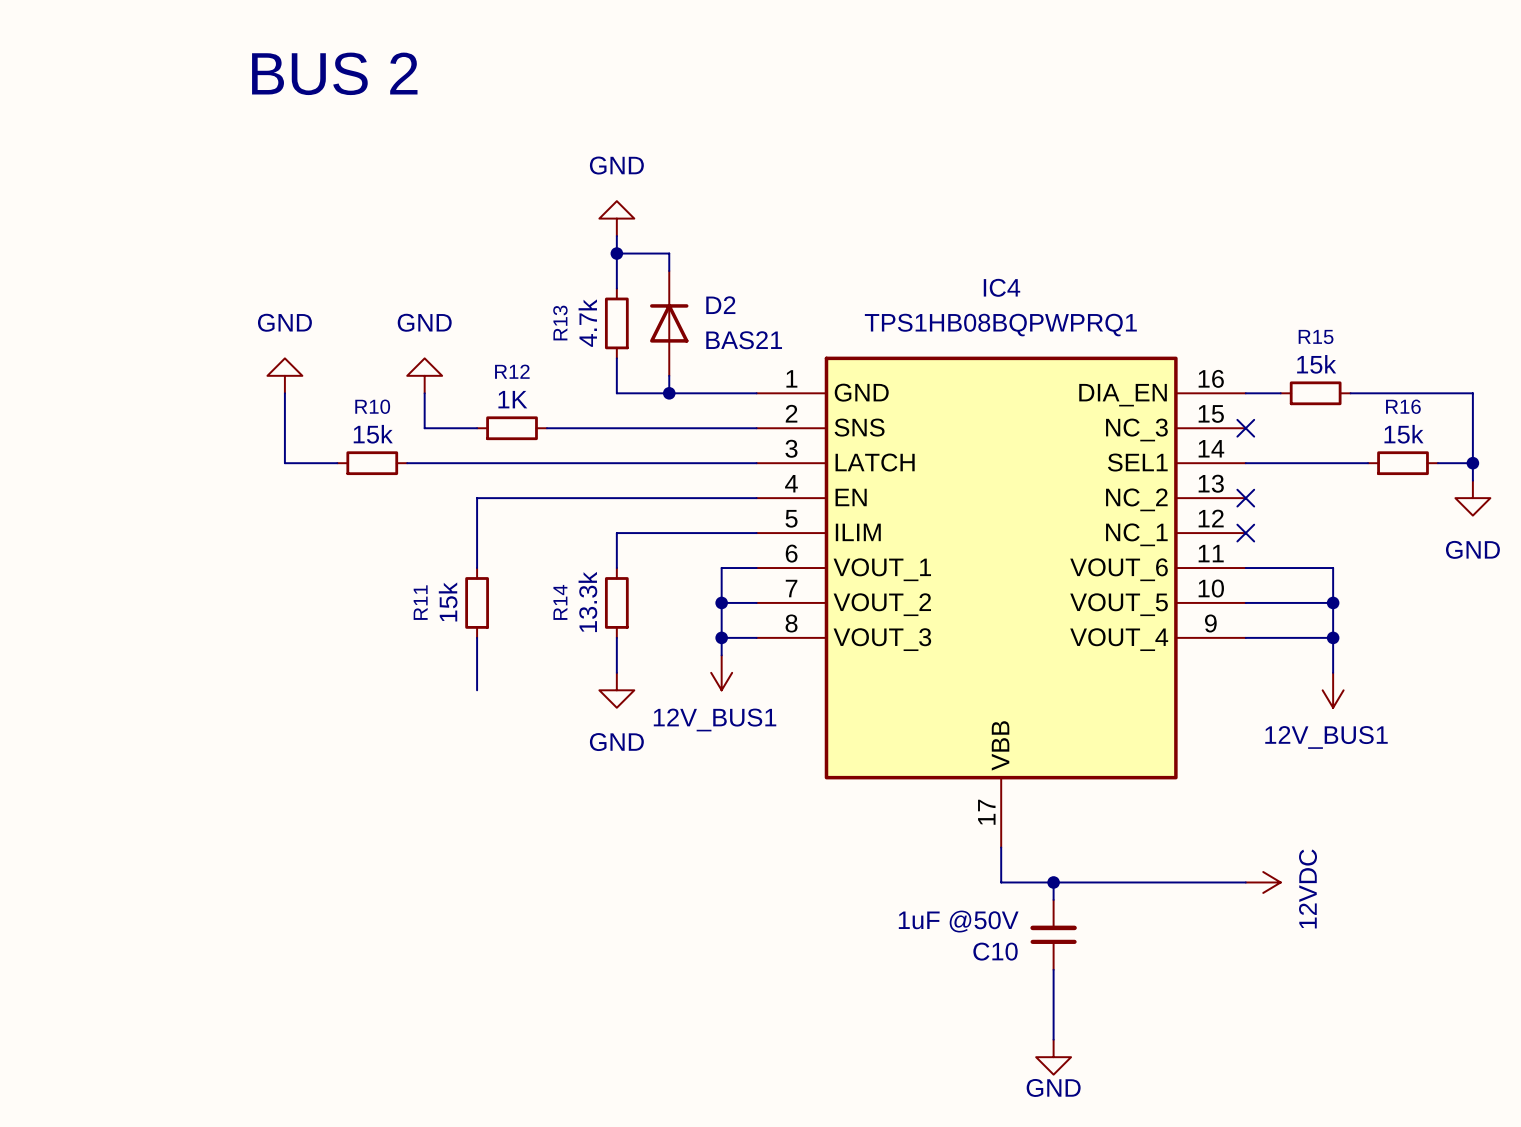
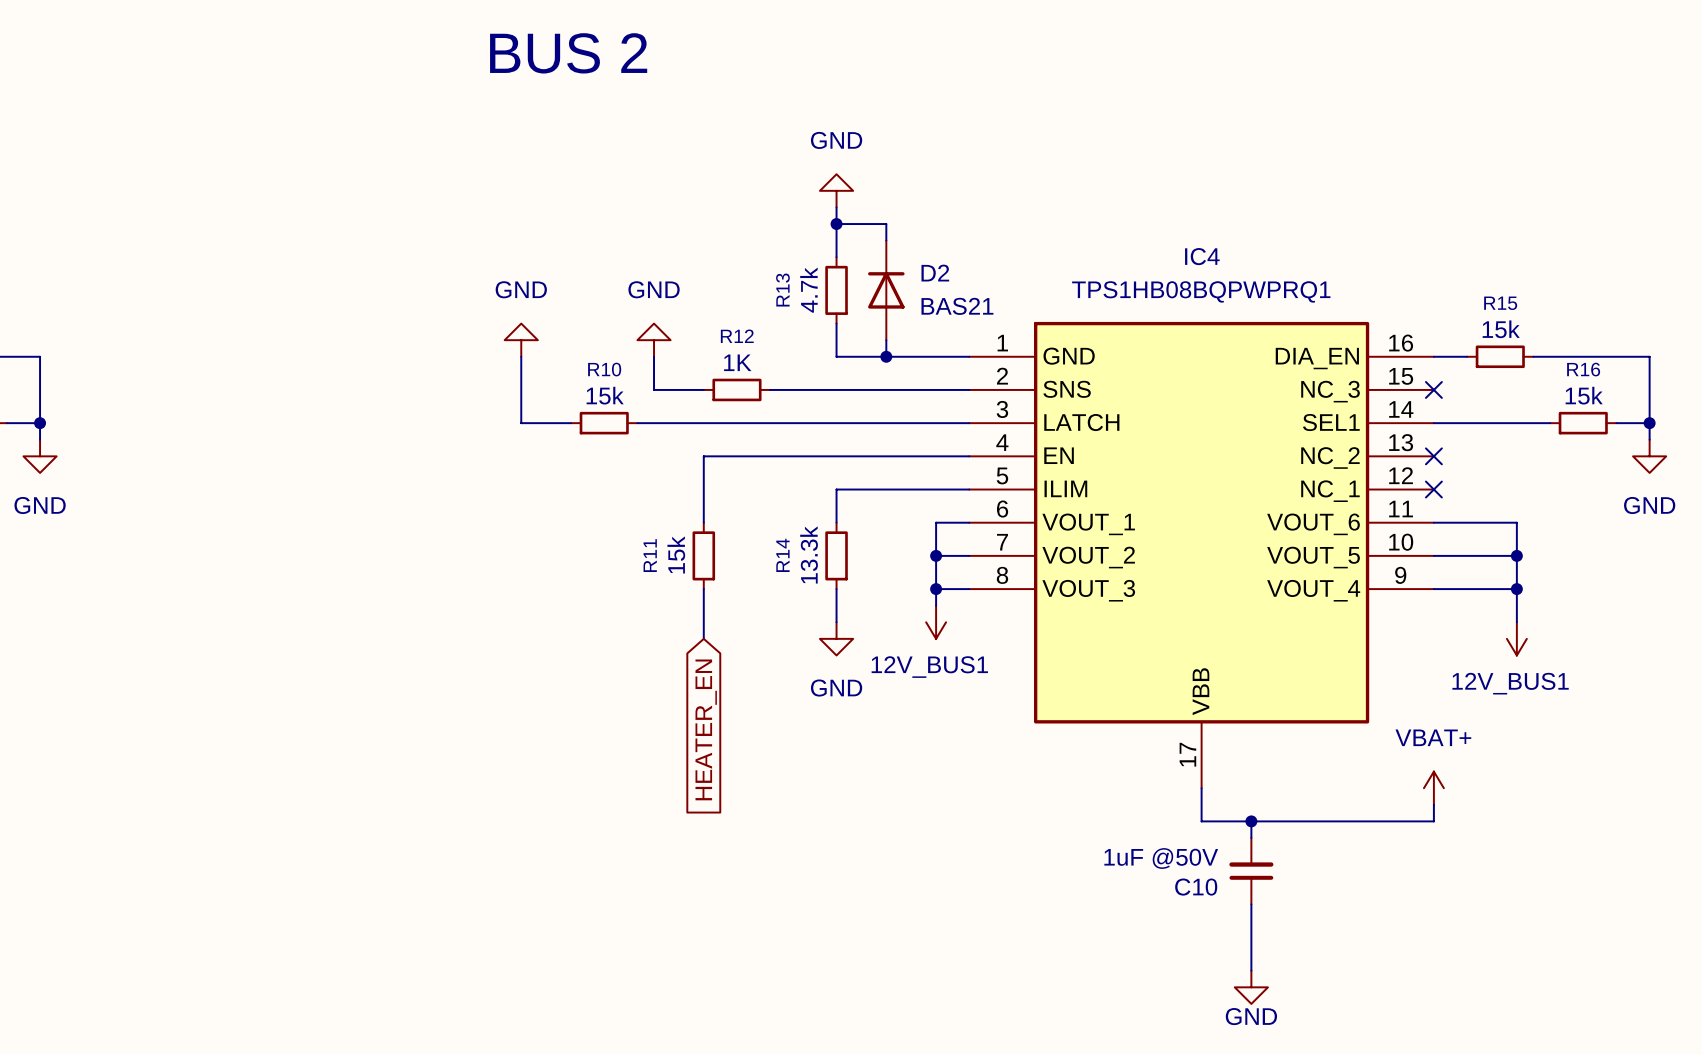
global label: none -> HEATER_EN (706, 729)
power symbol: none -> VBAT+ (1433, 788)
wire: none -> (1433, 804) (1433, 821)
power symbol: 12VDC (1263, 882) -> none

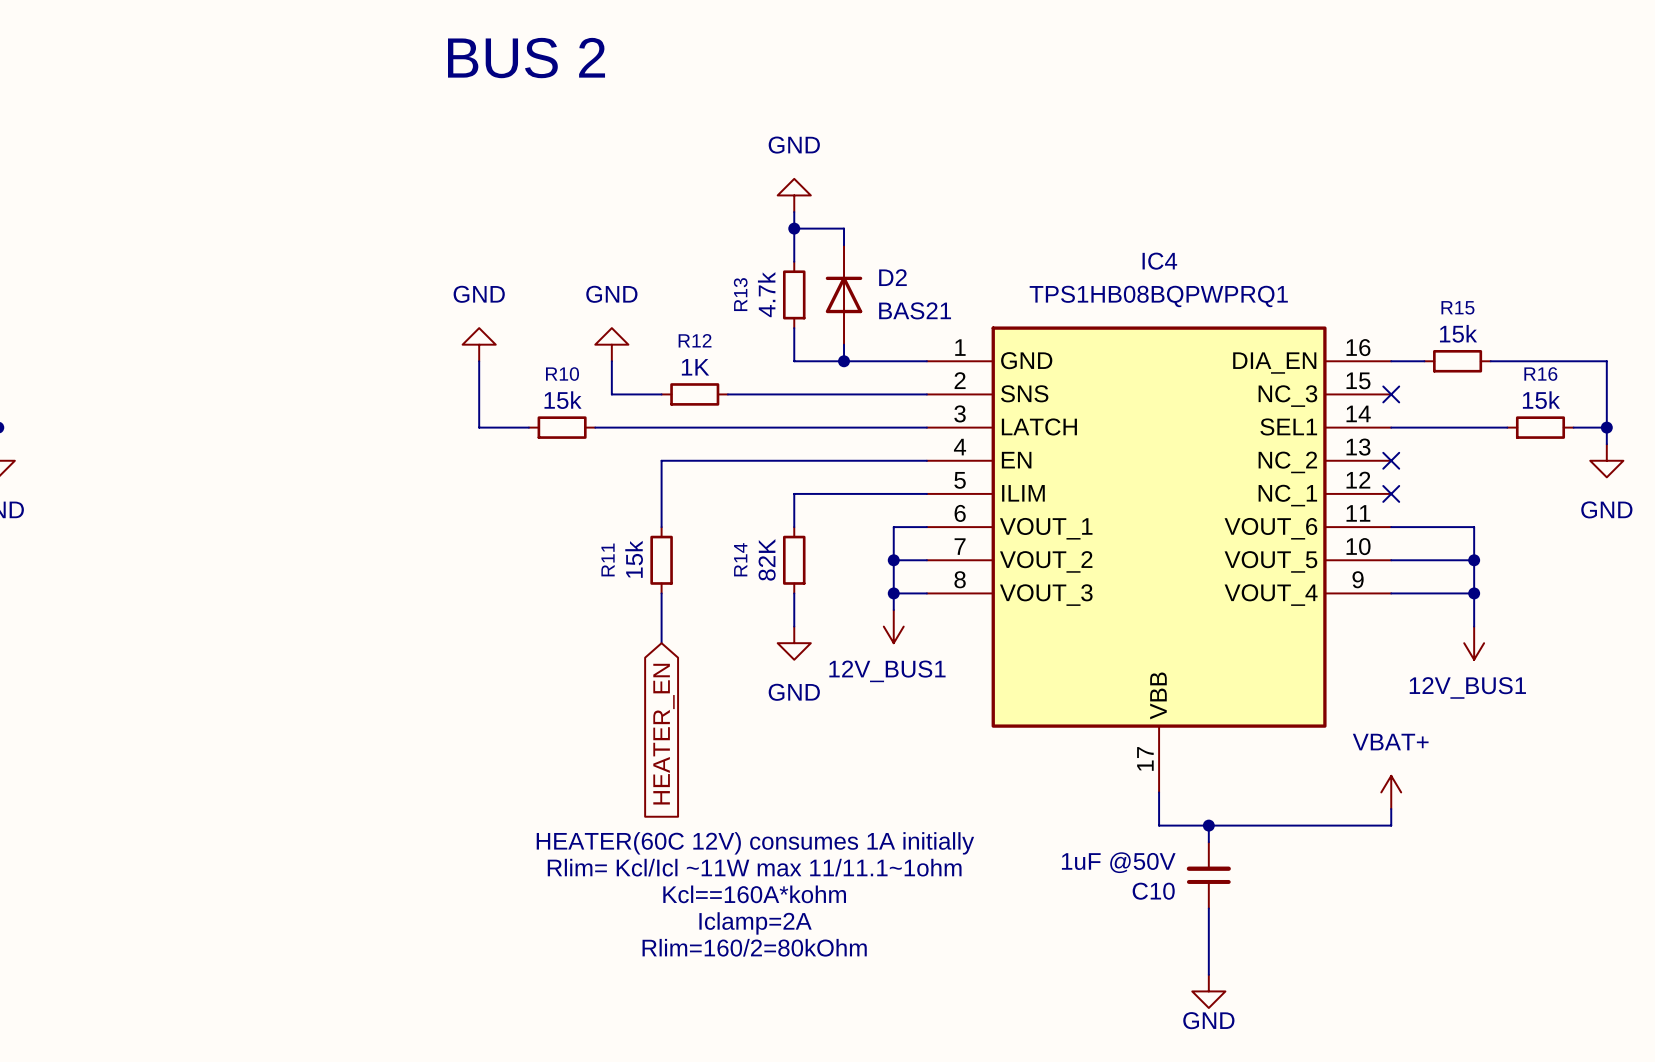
R14 value: 13.3k (809, 554) -> 82K (767, 559)
text: none -> HEATER(60C 12V) consumes 1A initially (755, 843)
text: none -> Rlim= Kcl/Icl ~11W max 11/11.1~1ohm (754, 867)
text: none -> Kcl==160A*kohm (754, 894)
text: none -> Iclamp=2A (755, 923)
text: none -> Rlim=160/2=80kOhm (754, 947)

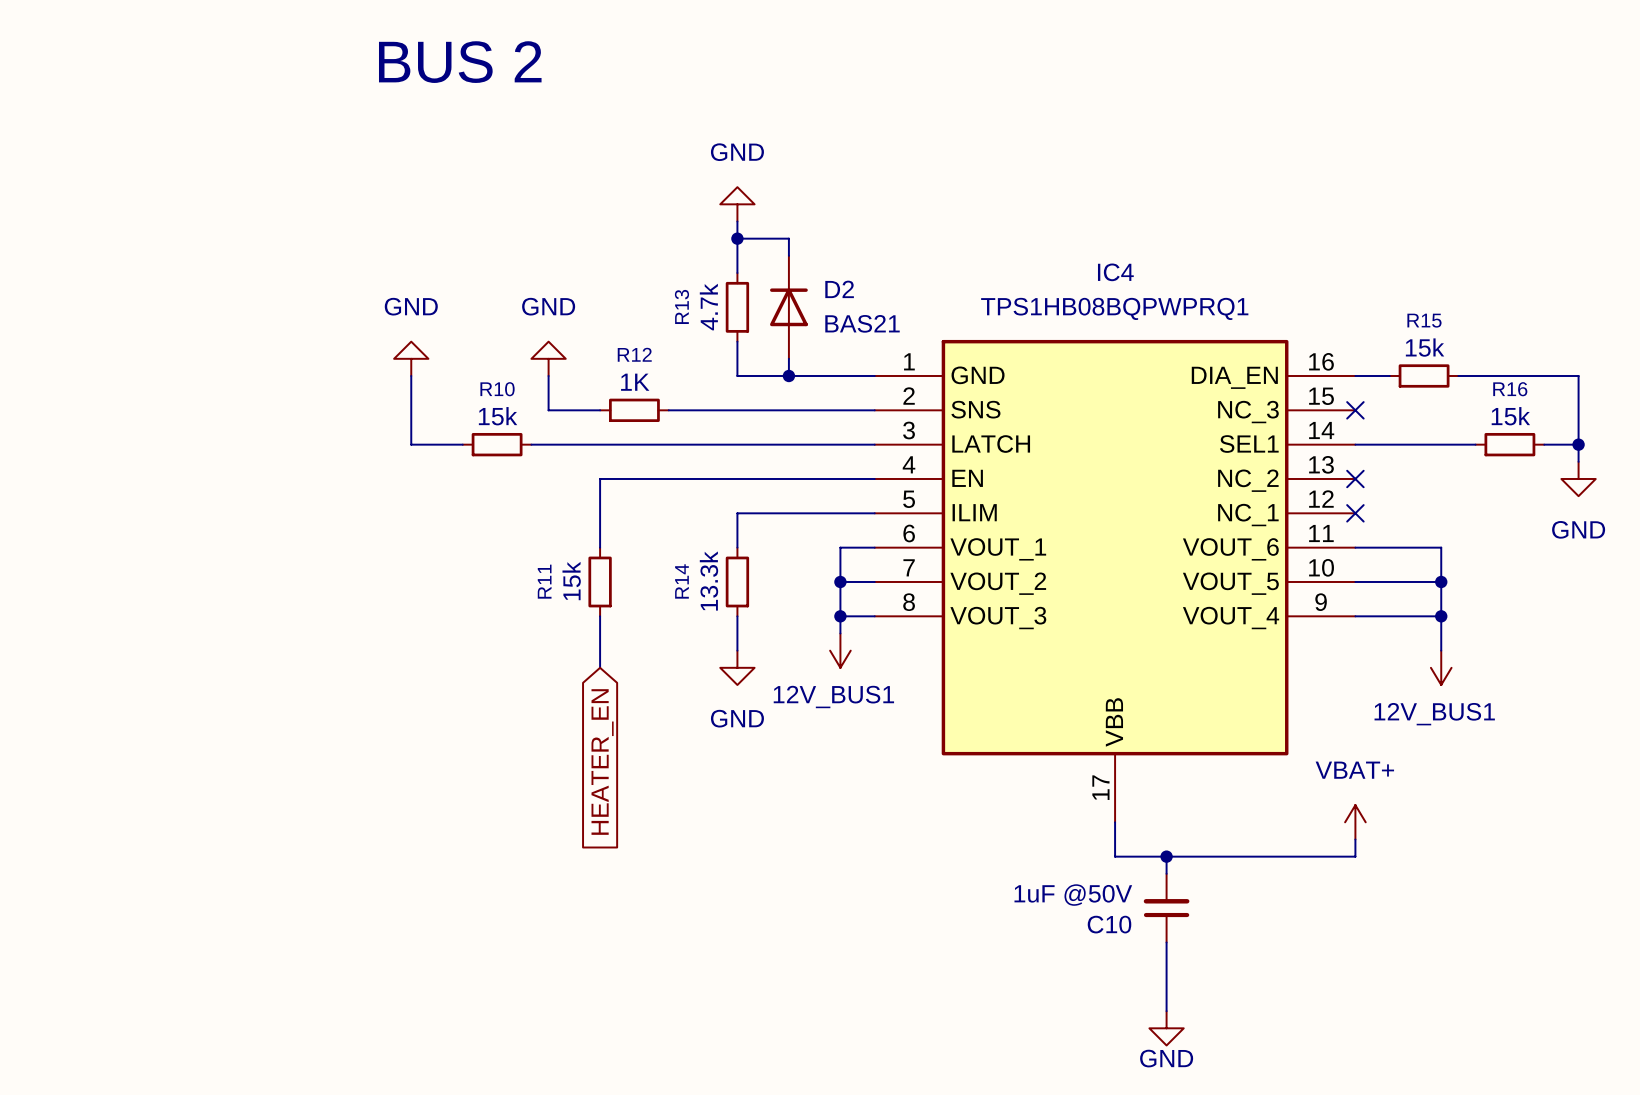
R14 value: 82K (767, 559) -> 13.3k (708, 581)
text: HEATER(60C 12V) consumes 1A initially (755, 843) -> none
text: Rlim= Kcl/Icl ~11W max 11/11.1~1ohm (754, 867) -> none
text: Kcl==160A*kohm (754, 894) -> none
text: Iclamp=2A (755, 923) -> none
text: Rlim=160/2=80kOhm (754, 947) -> none

